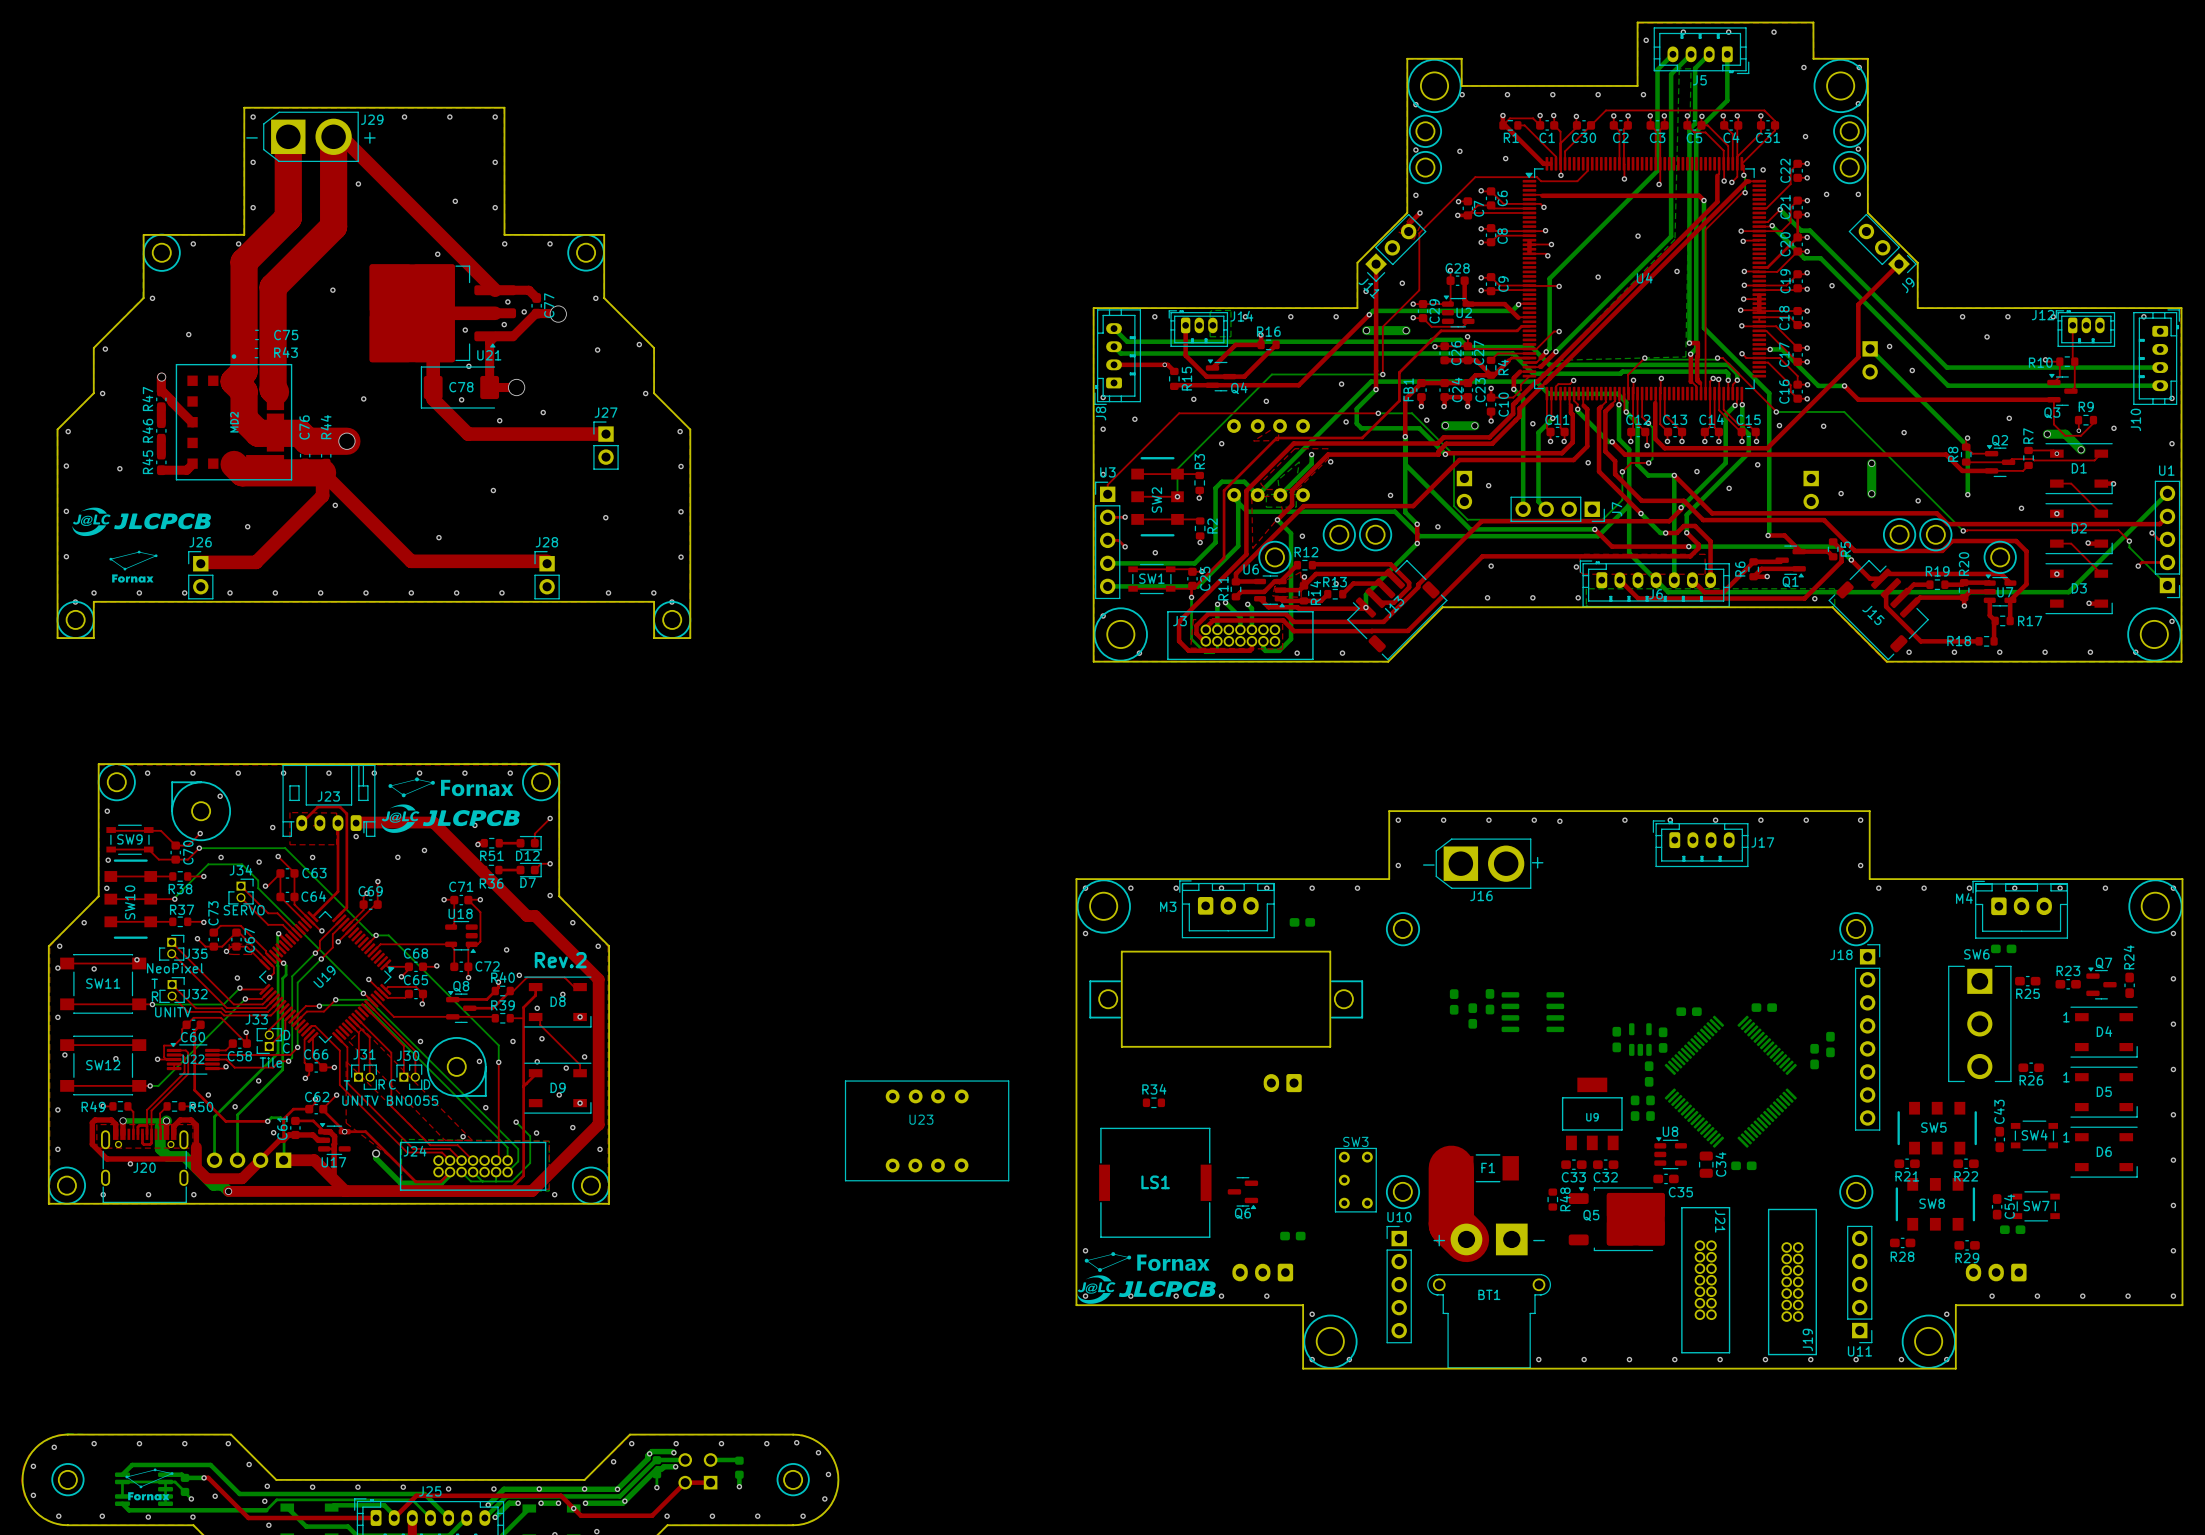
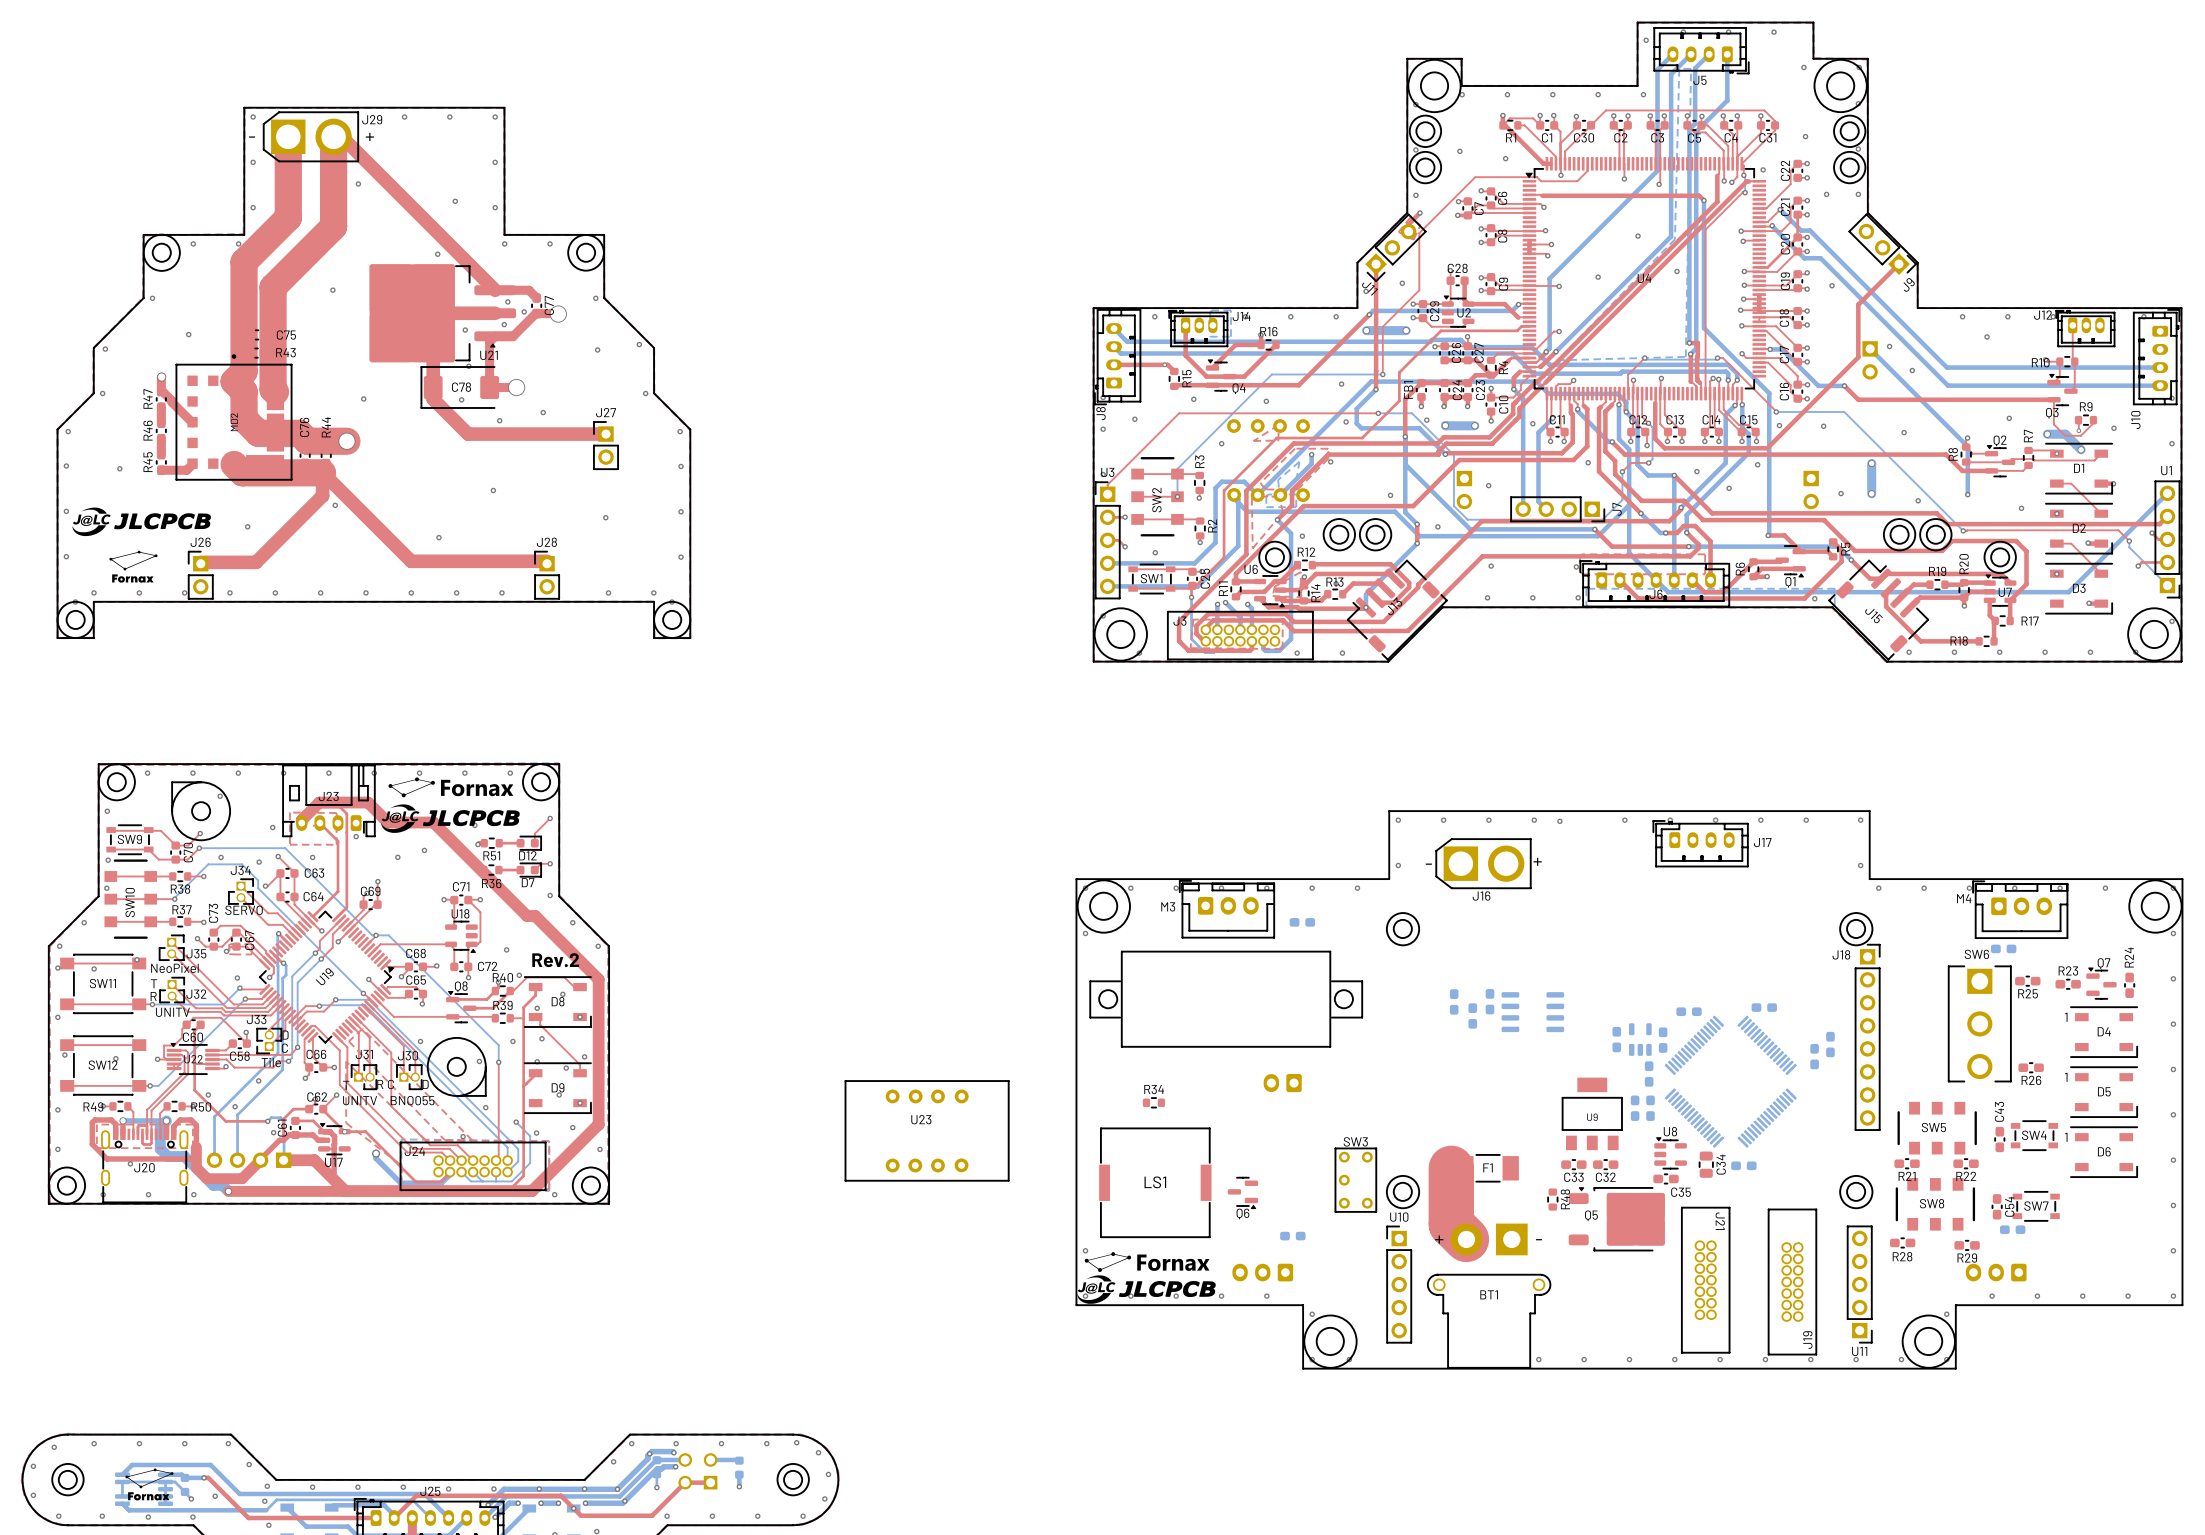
top track: (338, 821) (338, 841) -> (321, 821) (319, 823) (338, 841)
top track: (356, 822) (388, 822) -> (301, 823) (301, 820) (319, 802) (368, 802) (388, 822)

